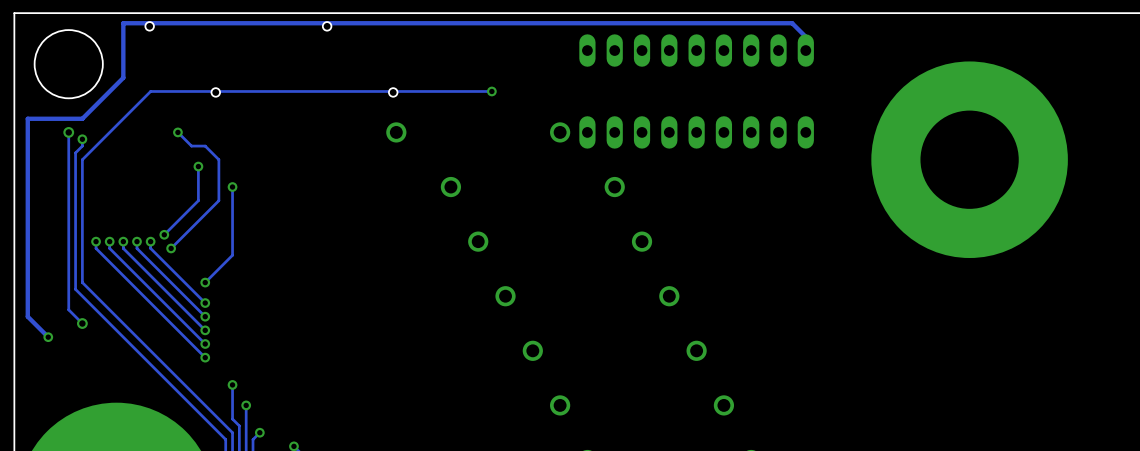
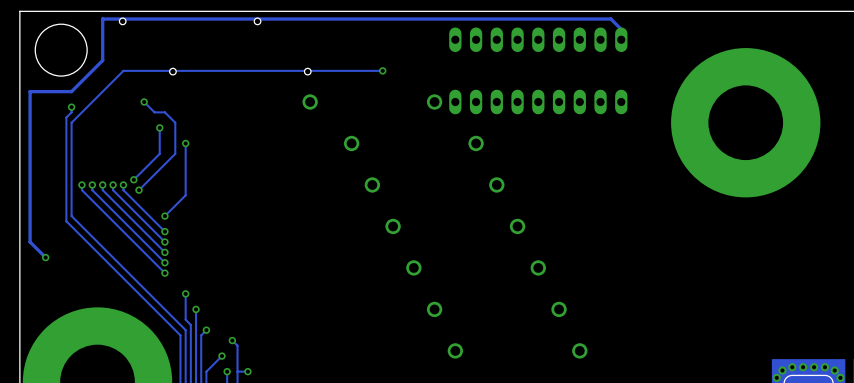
track: (68, 132) (68, 309) (82, 323) -> none
via: (68, 132) -> none
via: (82, 323) -> none

